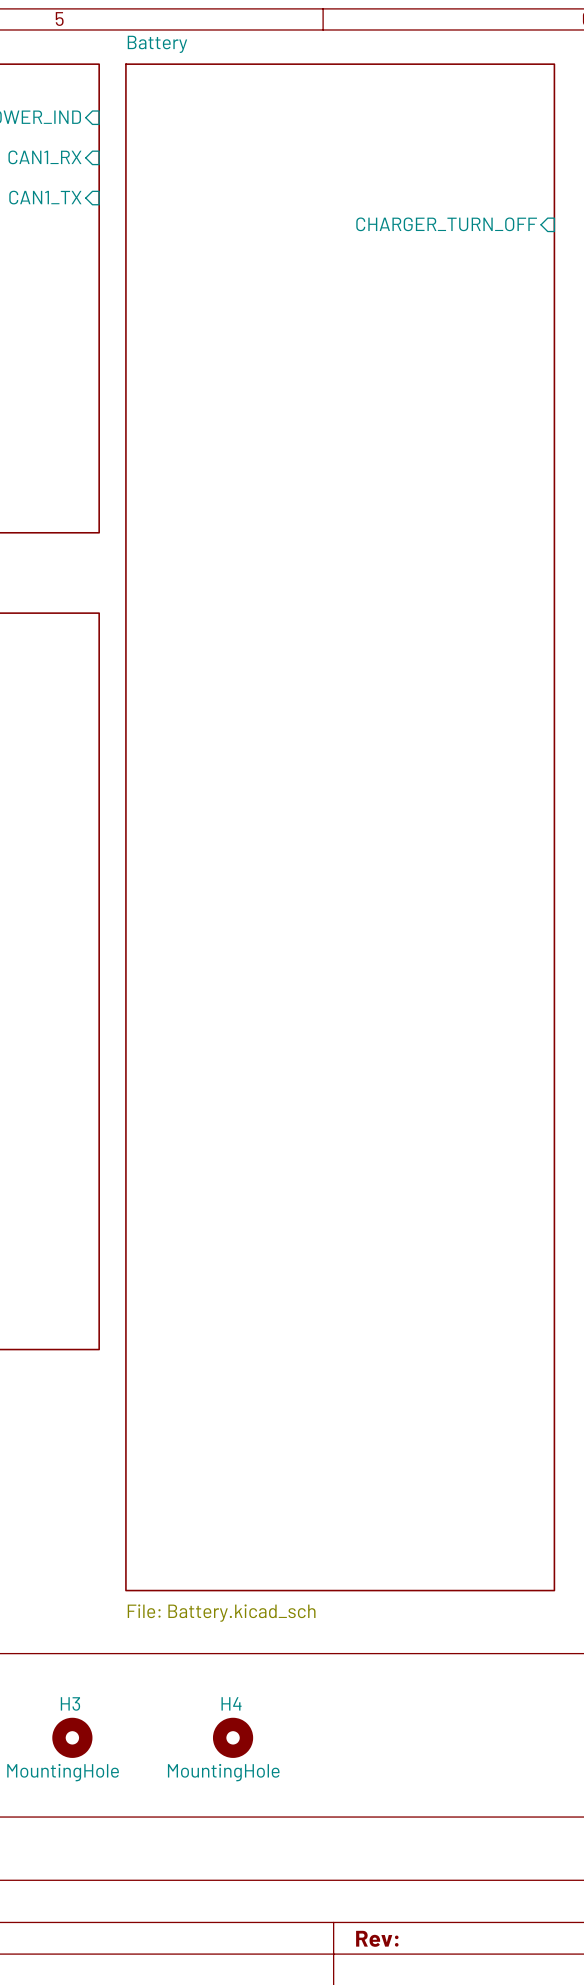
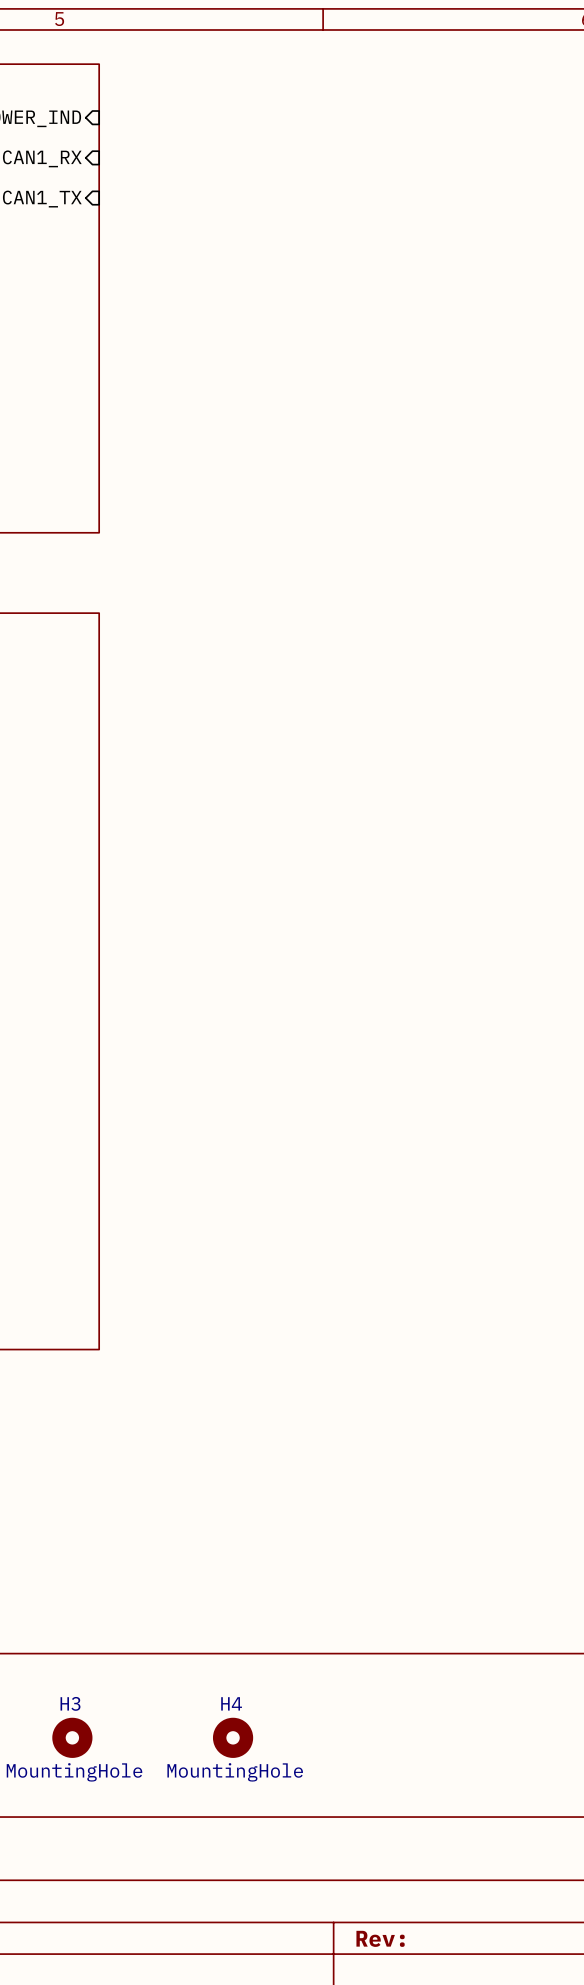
sheet pin: CHARGER_TURN_OFF (446, 224) -> none
sheet Battery: File: Battery.kicad_sch (340, 827) -> none

